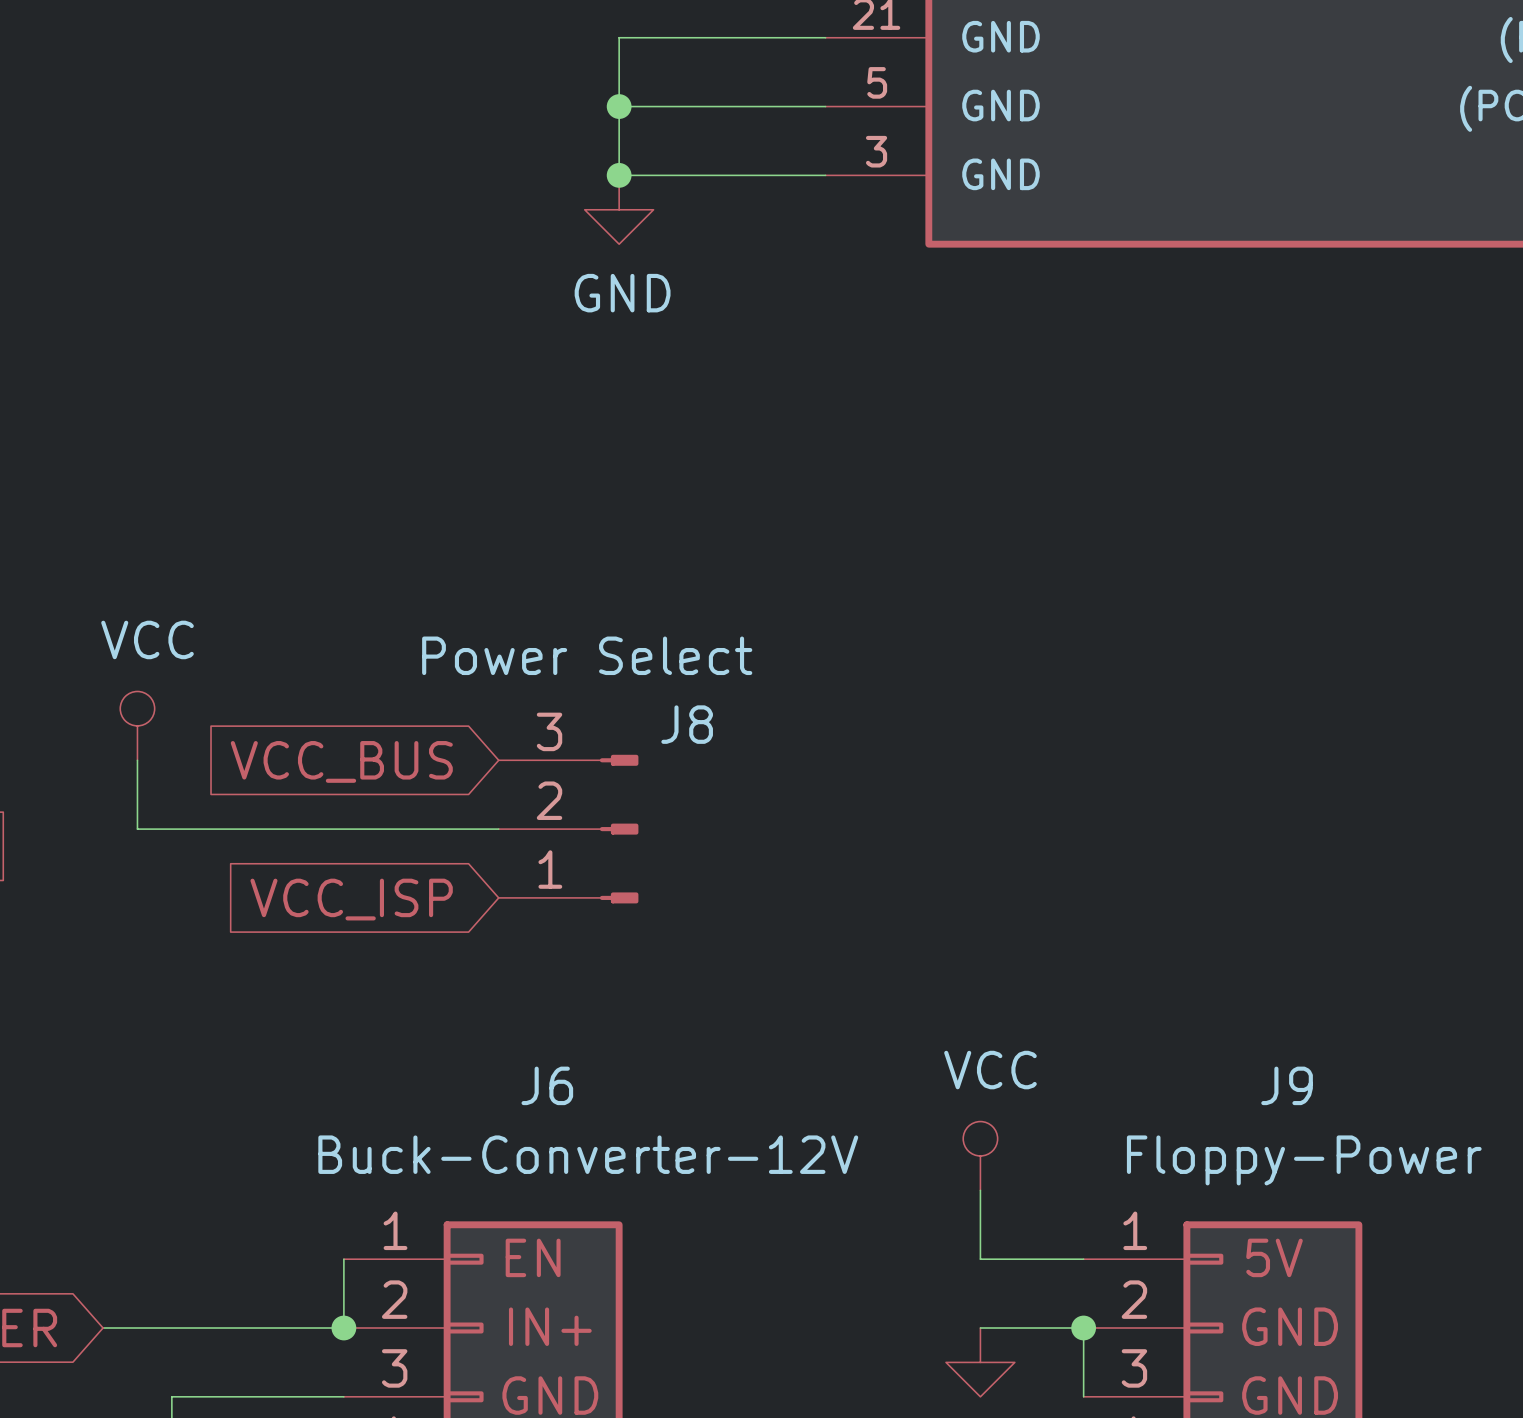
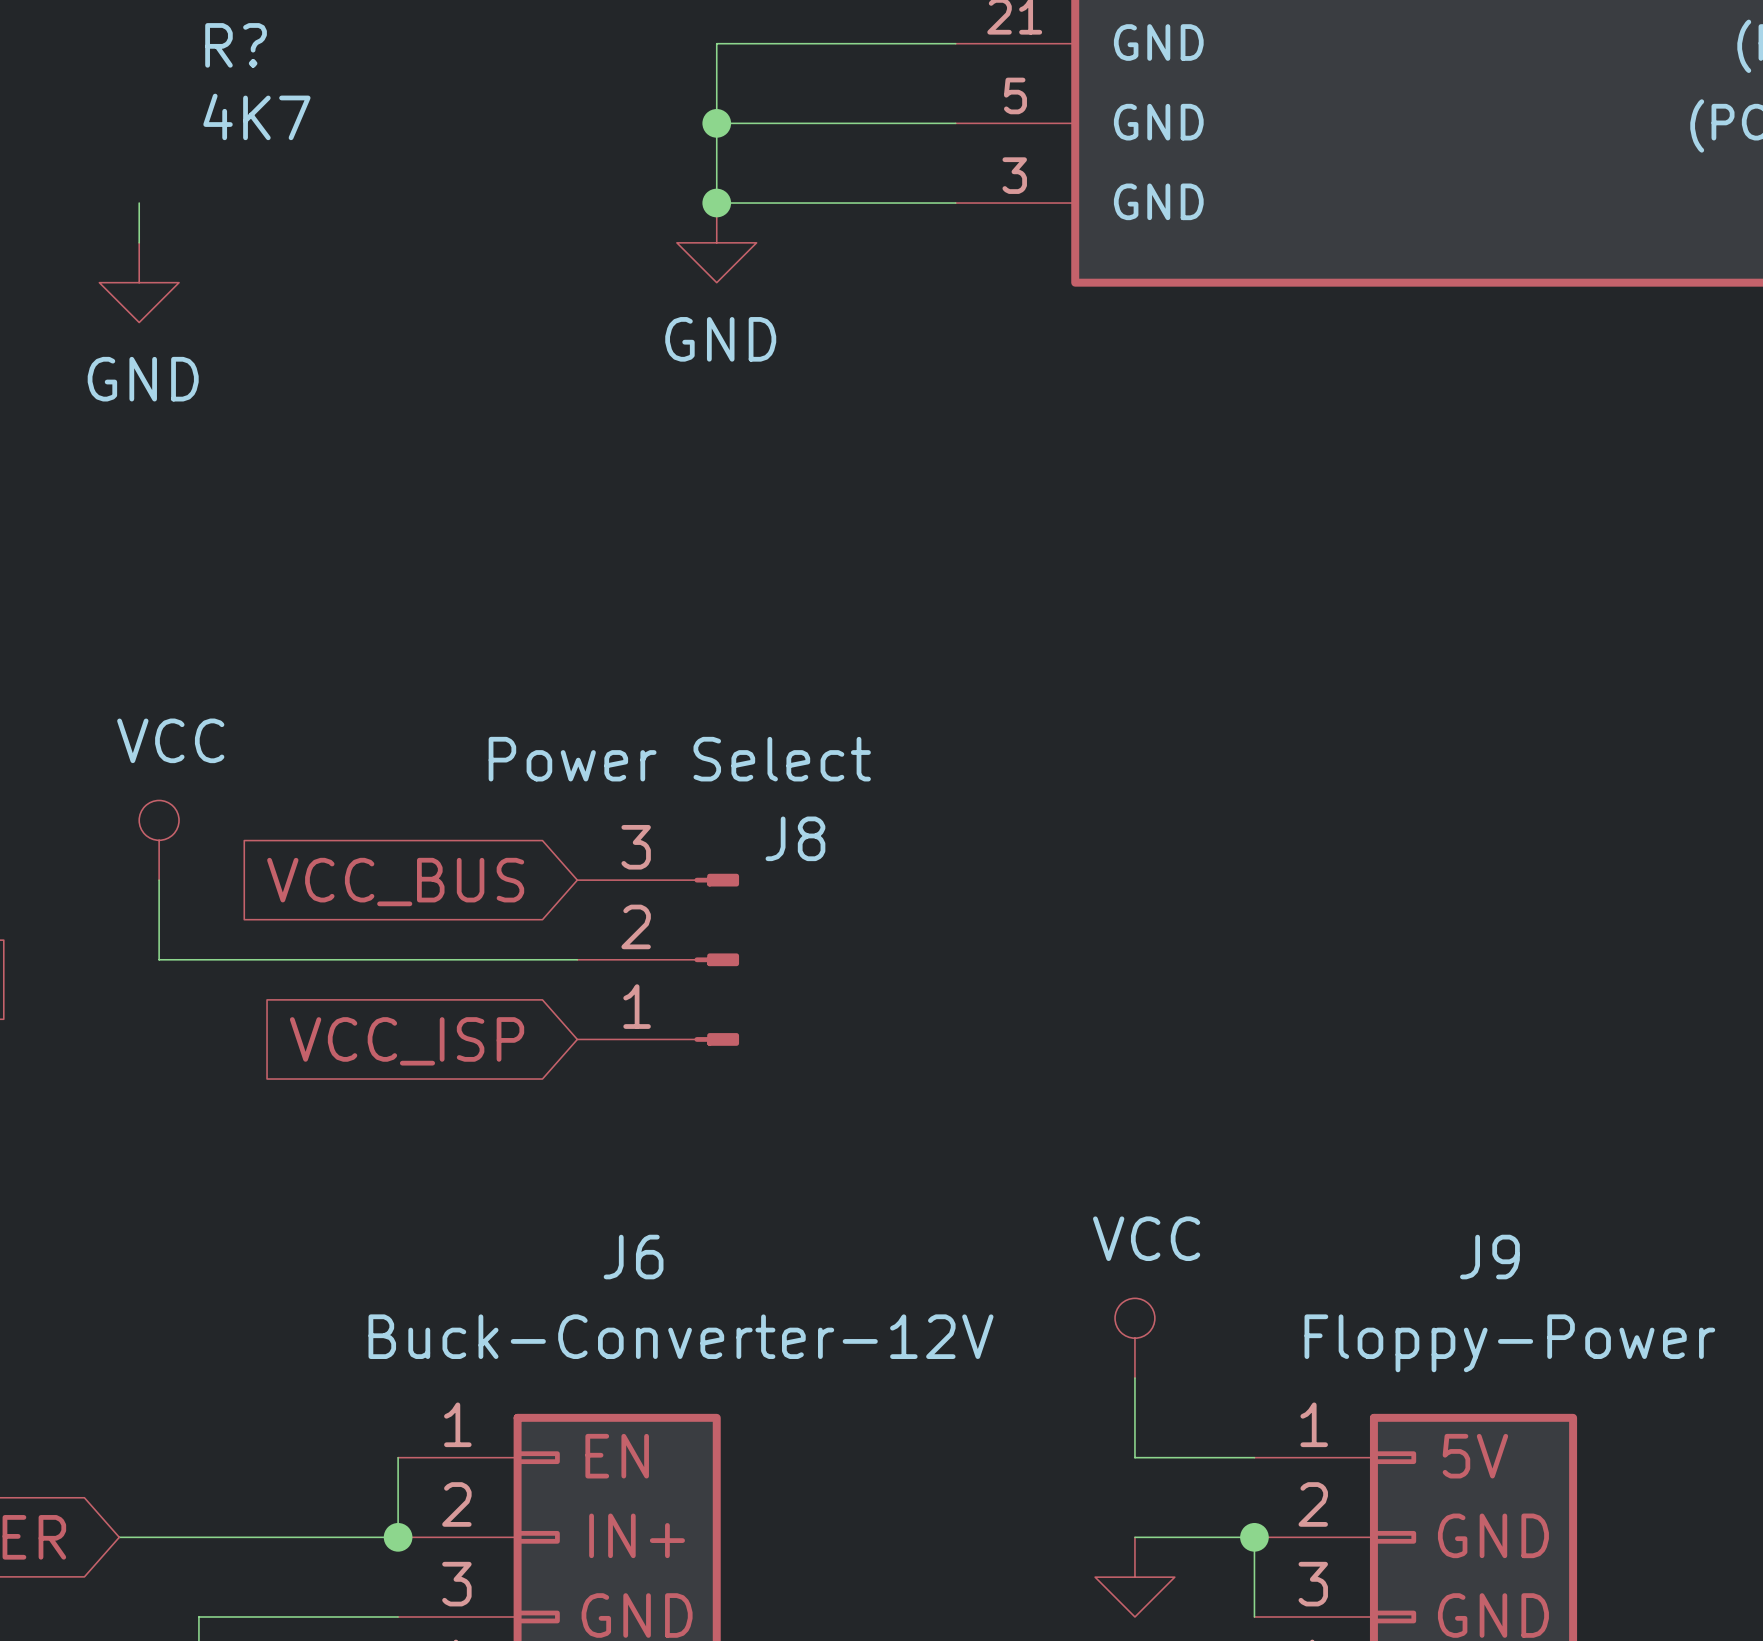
R?: none -> 4K7 (256, 81)
wire: none -> (139, 203) (139, 242)
power symbol: none -> GND (139, 282)

